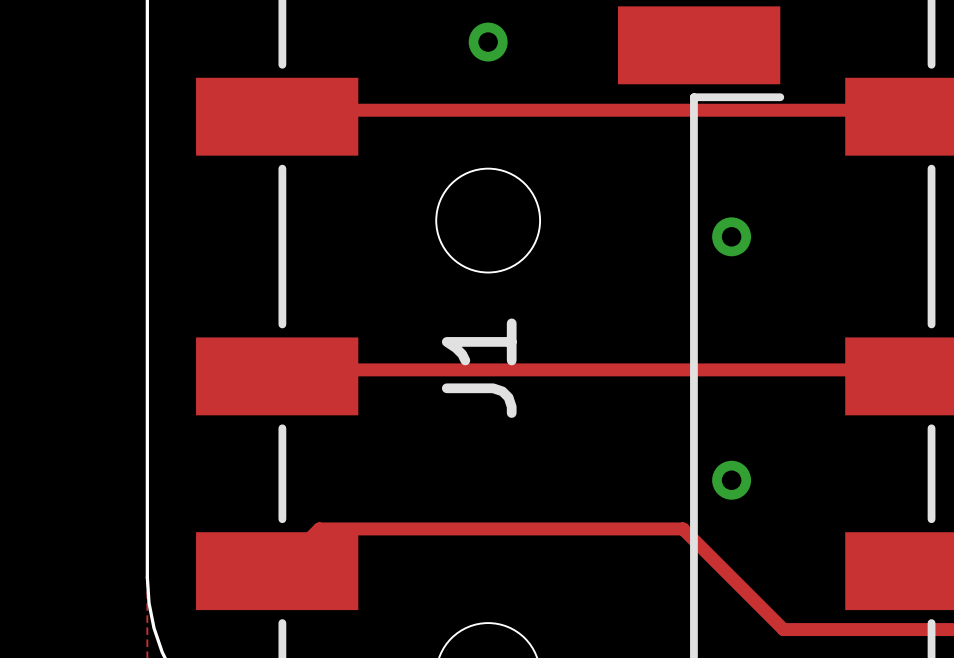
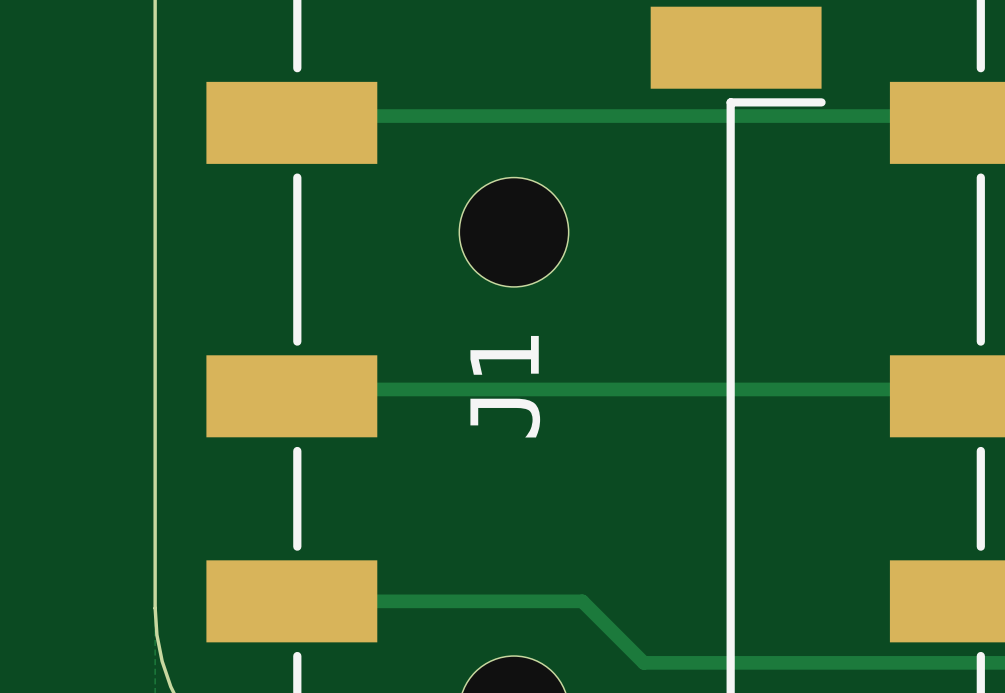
via: (488, 42) -> none
via: (731, 236) -> none
via: (731, 480) -> none
track: (277, 571) (319, 528) (682, 528) (783, 629) -> (291, 601) (582, 601) (643, 662) (824, 662)

